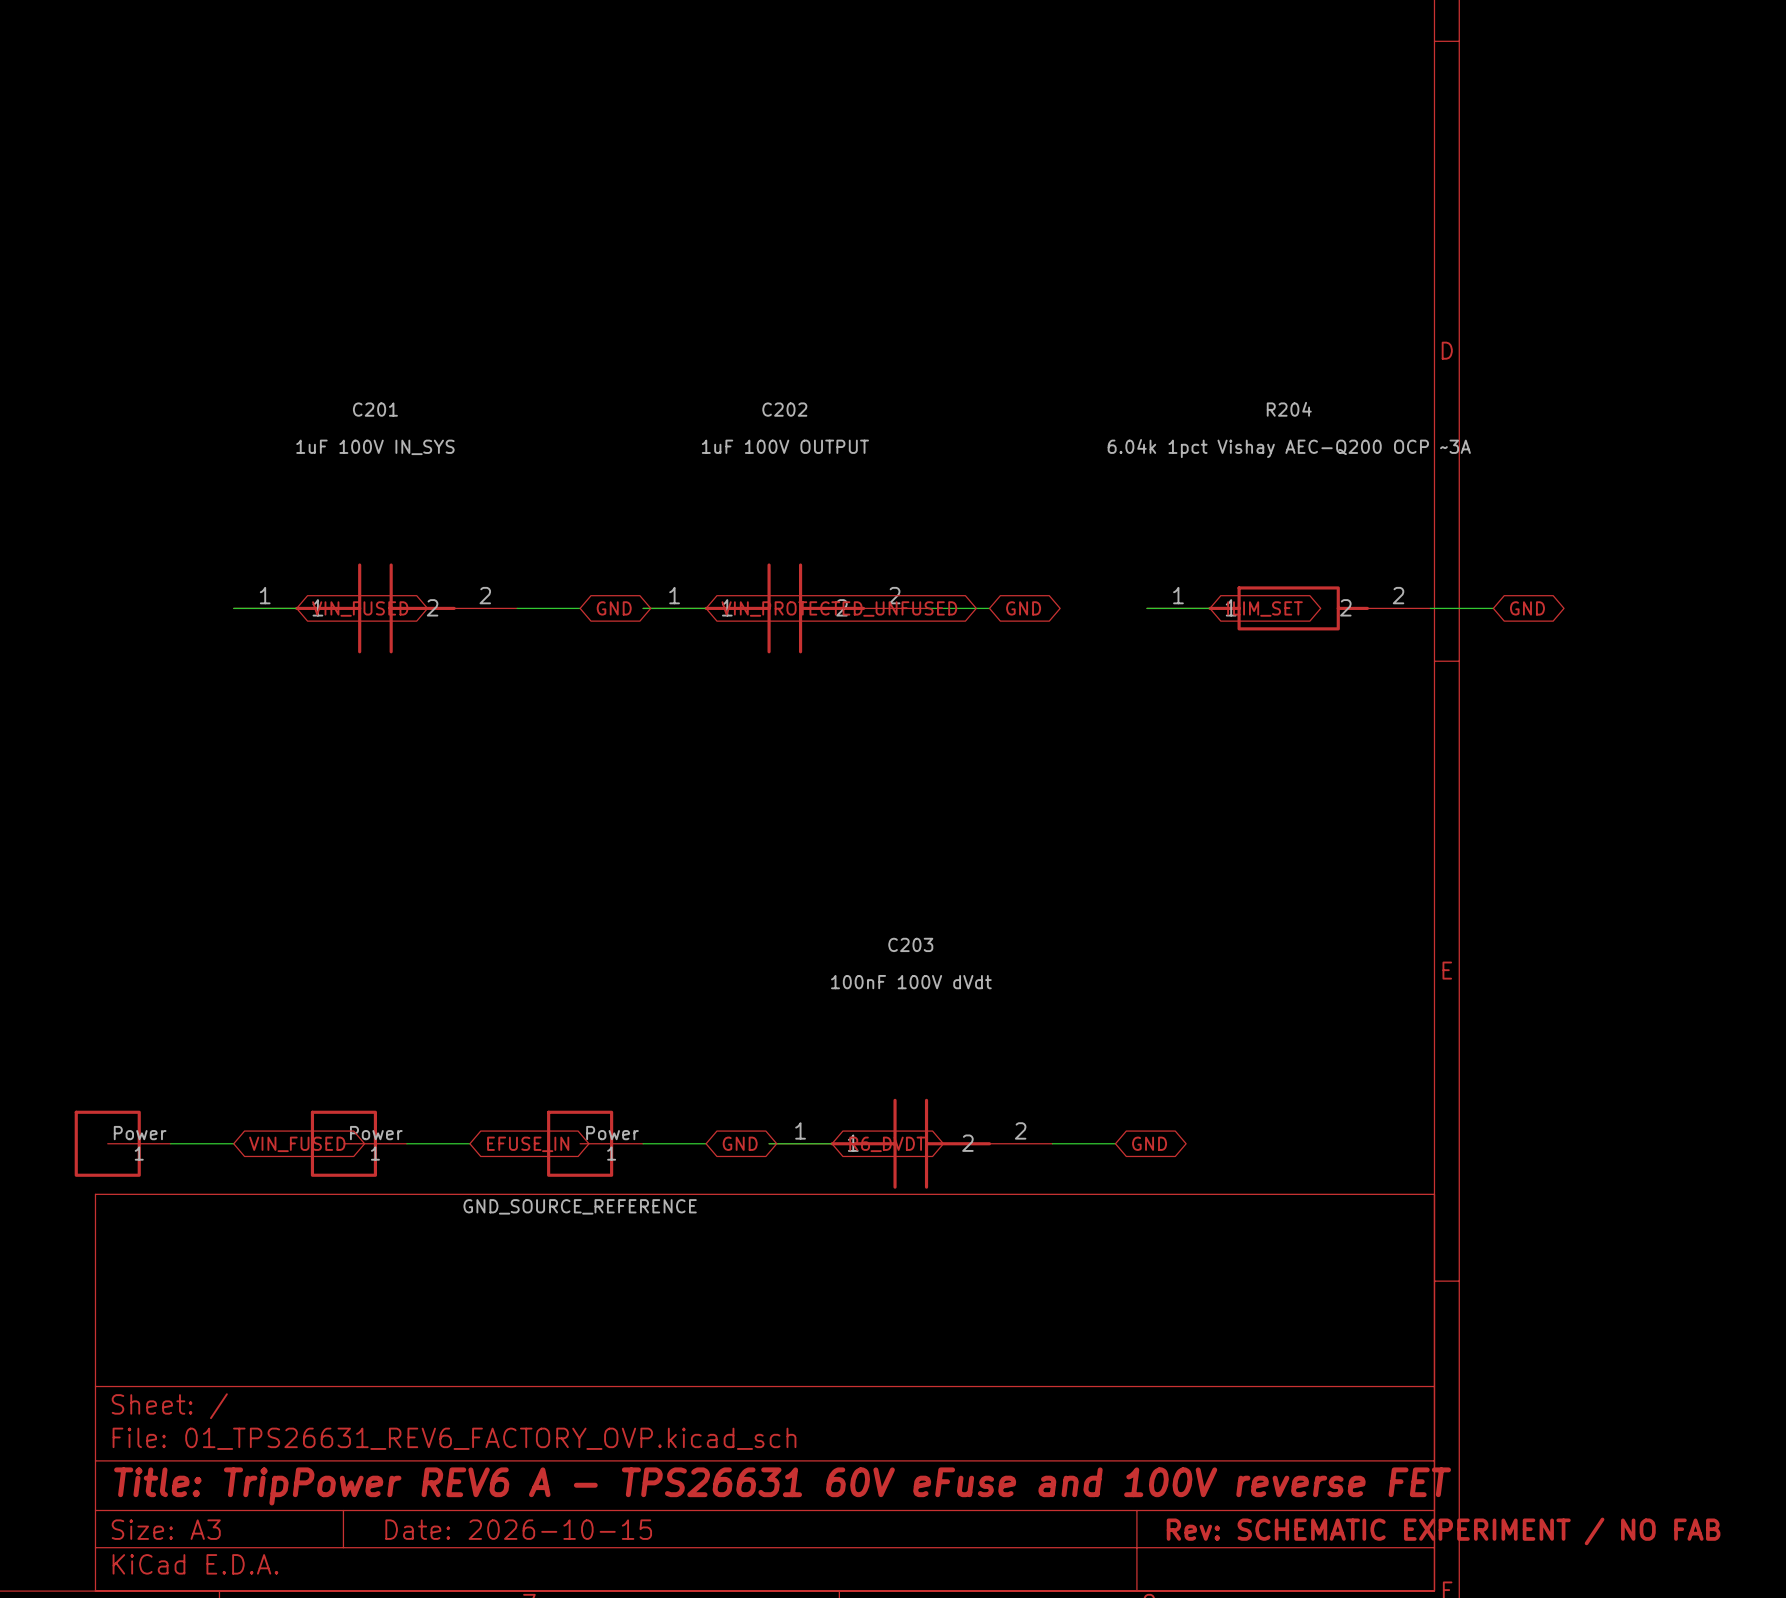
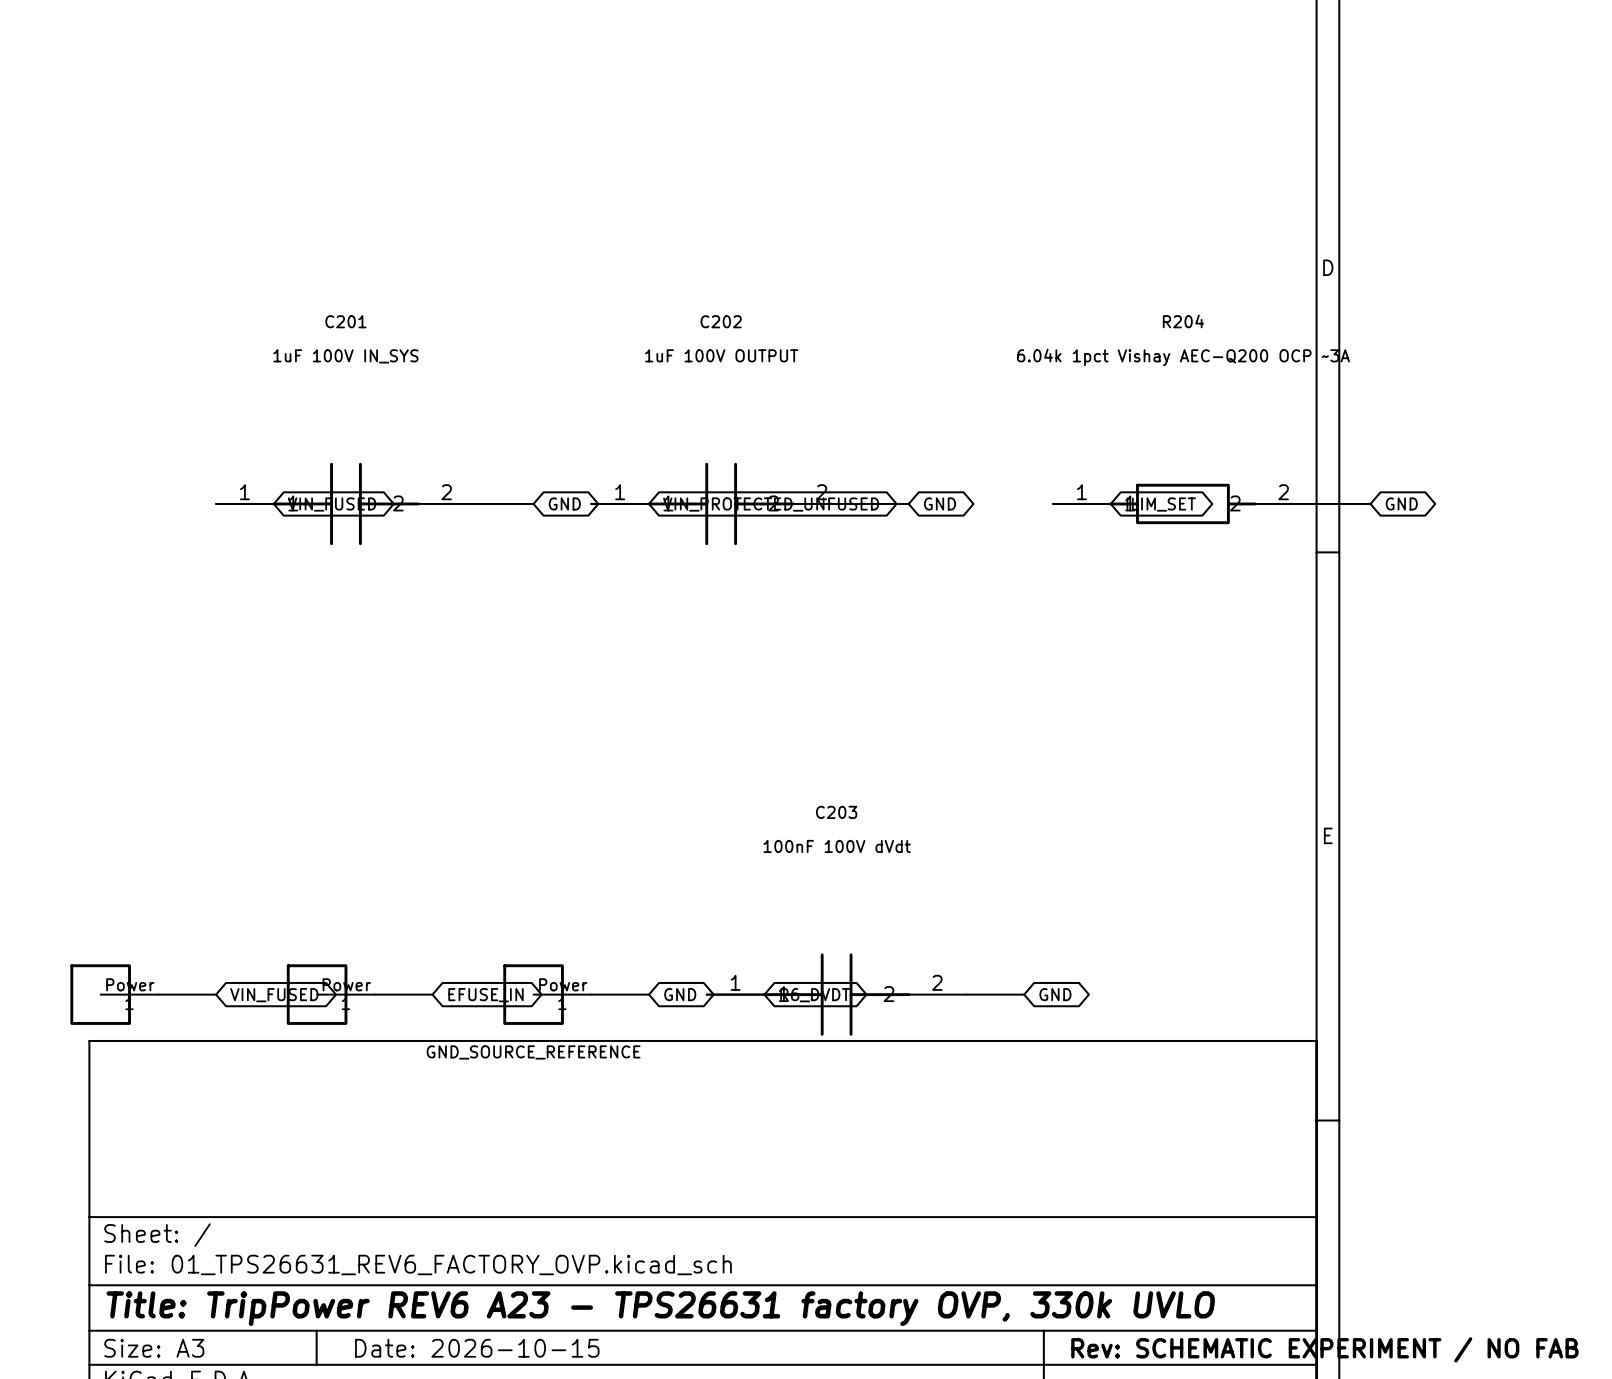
title block: Title: TripPower REV6 A - TPS26631 60V eFuse and 100V reverse FET (782, 1486) -> Title: TripPower REV6 A23 - TPS26631 factory OVP, 330k UVLO (660, 1308)

